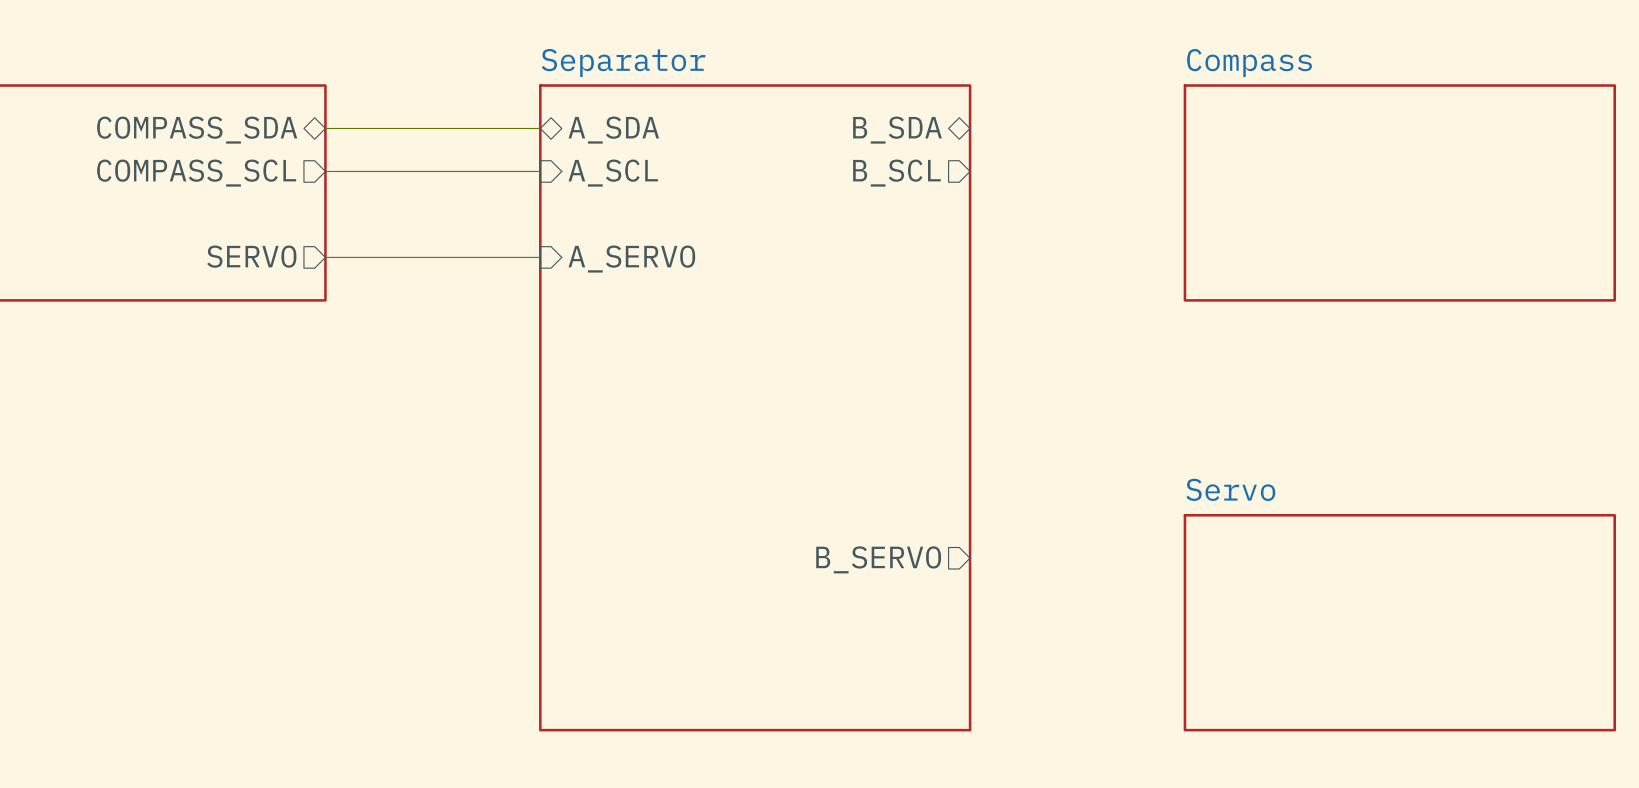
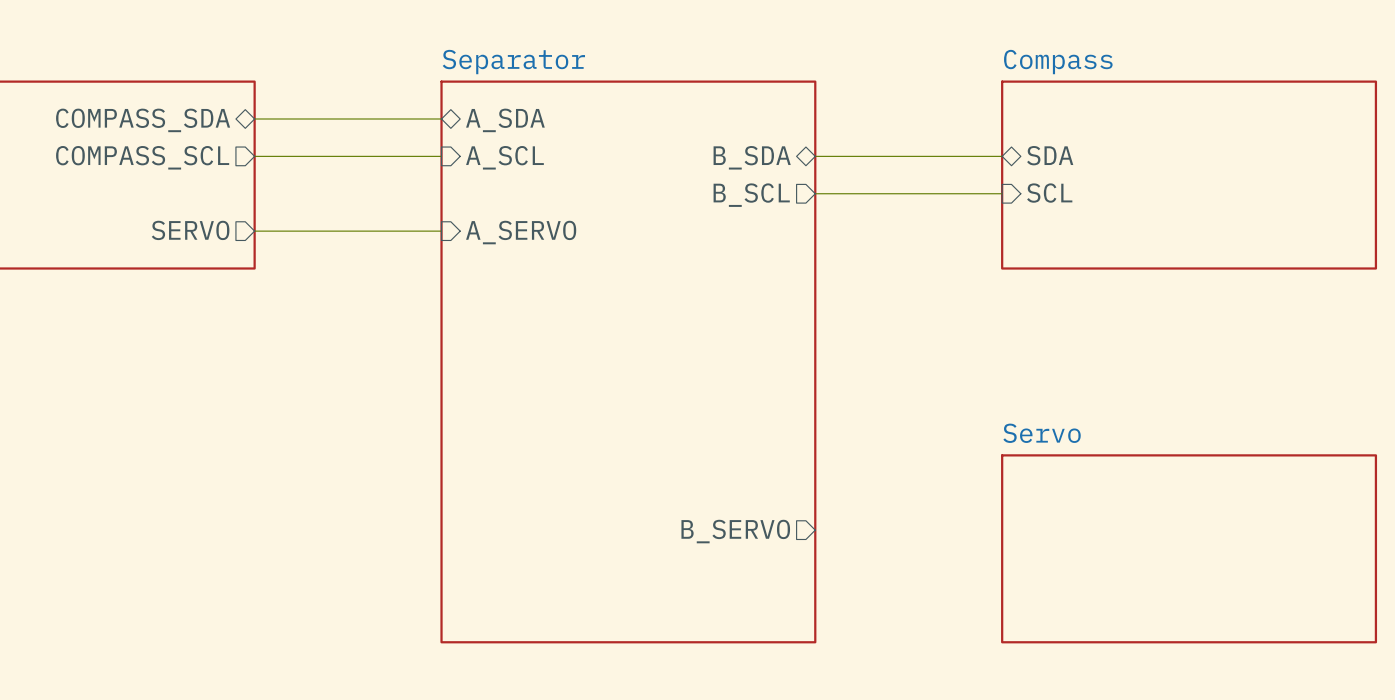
sheet pin: B_SDA (897, 130) -> none
sheet pin: none -> SDA (1050, 155)
wire: none -> (815, 156) (1002, 156)
sheet pin shape: output (896, 173) -> bidirectional (752, 157)
sheet pin: B_SCL (896, 173) -> B_SDA (752, 157)
sheet pin: none -> SCL (1049, 193)
wire: none -> (815, 193) (1002, 193)
sheet pin: none -> B_SCL (751, 195)
sheet pin position: B_SERVO (878, 559) -> B_SERVO (735, 531)

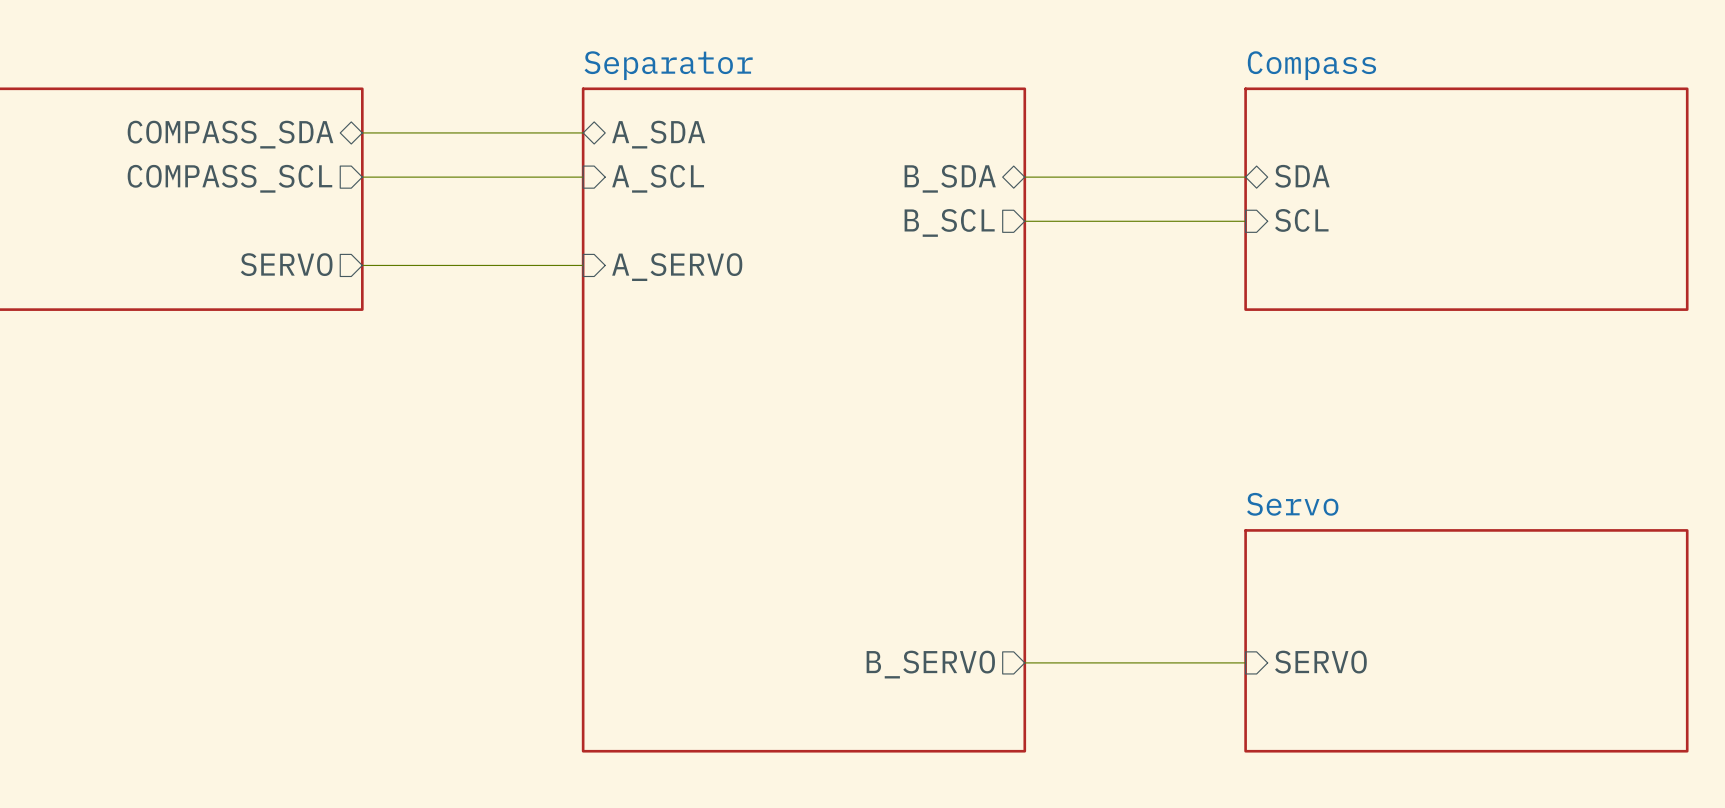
sheet pin position: B_SERVO (735, 531) -> B_SERVO (930, 664)
sheet pin: none -> SERVO (1320, 662)
wire: none -> (1024, 662) (1245, 662)

